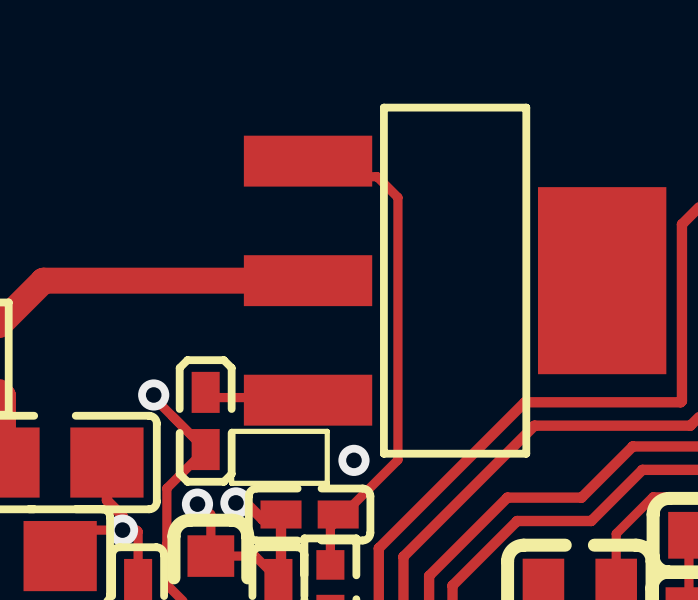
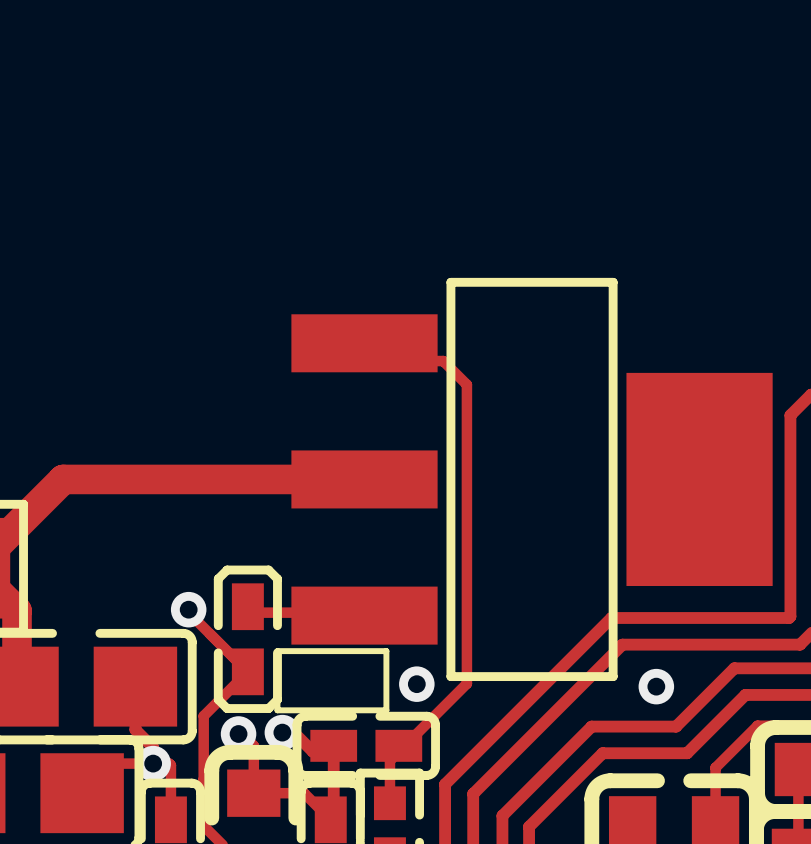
via: none -> (656, 686)

